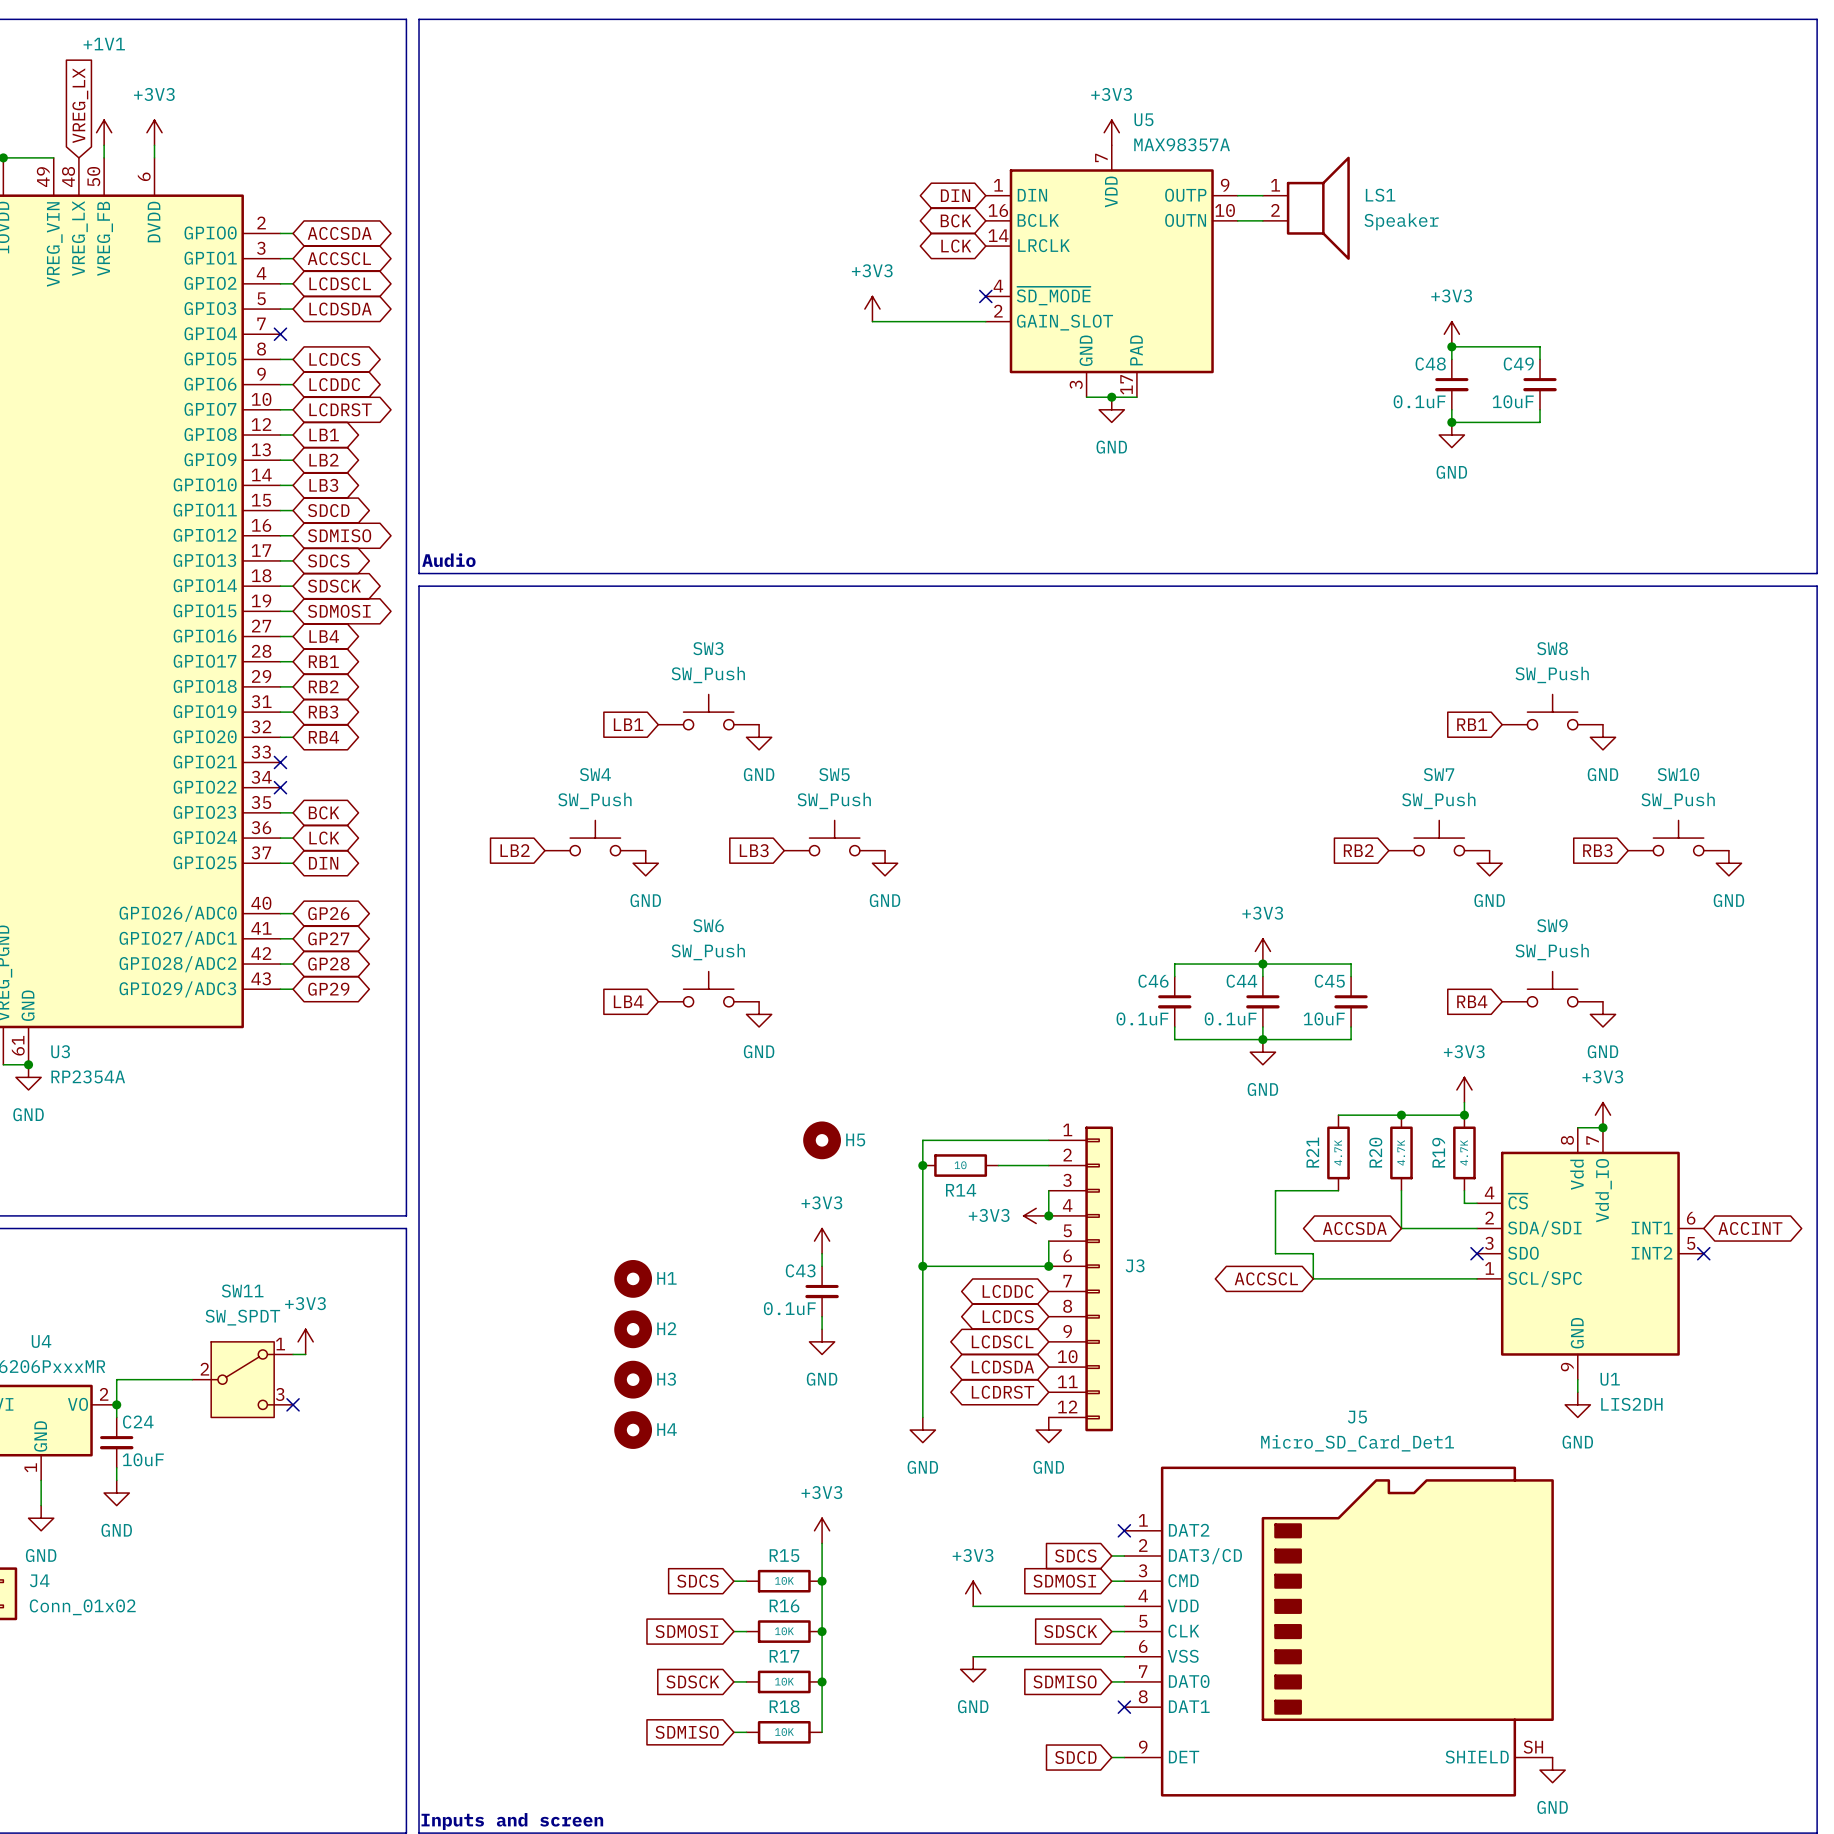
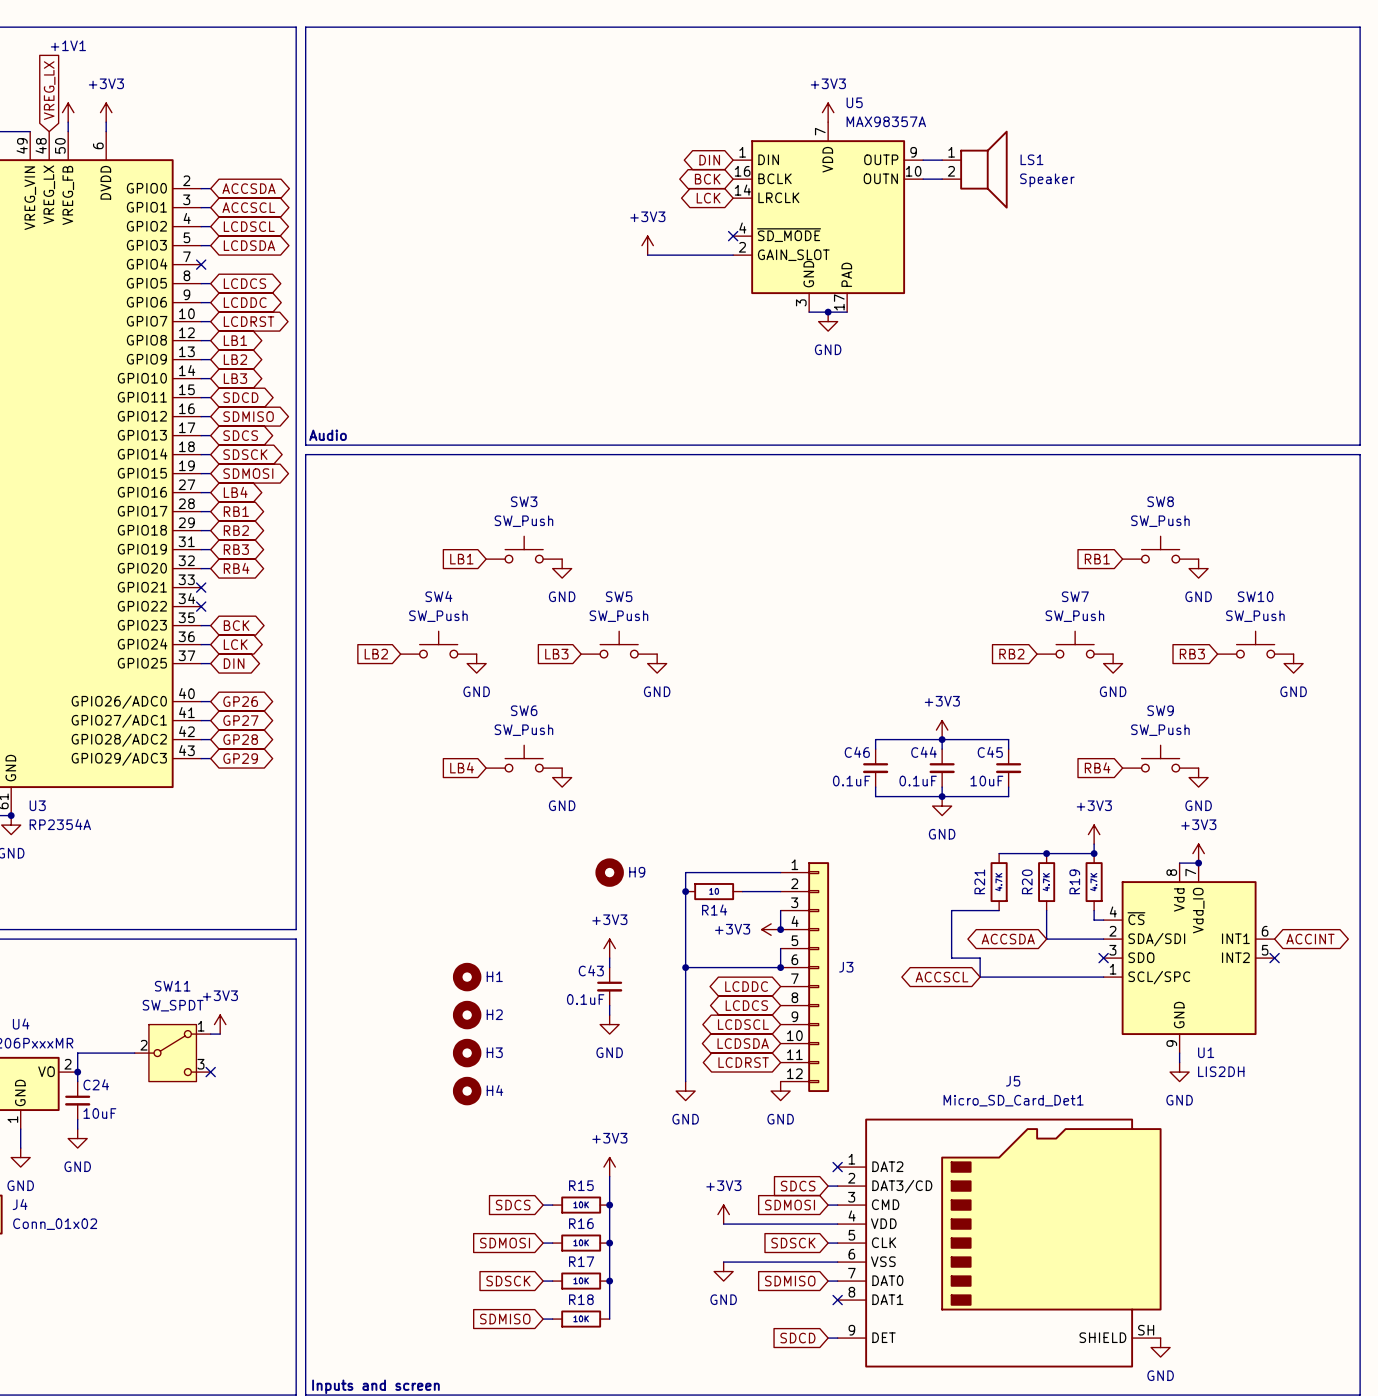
power symbol: +3V3 (1451, 334) -> none
junction: (1451, 346) -> none
wire: (1451, 359) (1451, 346) (1540, 346) (1540, 359) -> none
C48: 0.1uF (1451, 384) -> none
C49: 10uF (1540, 384) -> none
wire: (1451, 409) (1451, 422) (1540, 422) (1540, 409) -> none
junction: (1451, 422) -> none
power symbol: GND (1451, 435) -> none
H5 name: H5 (855, 1139) -> H9 (637, 872)

